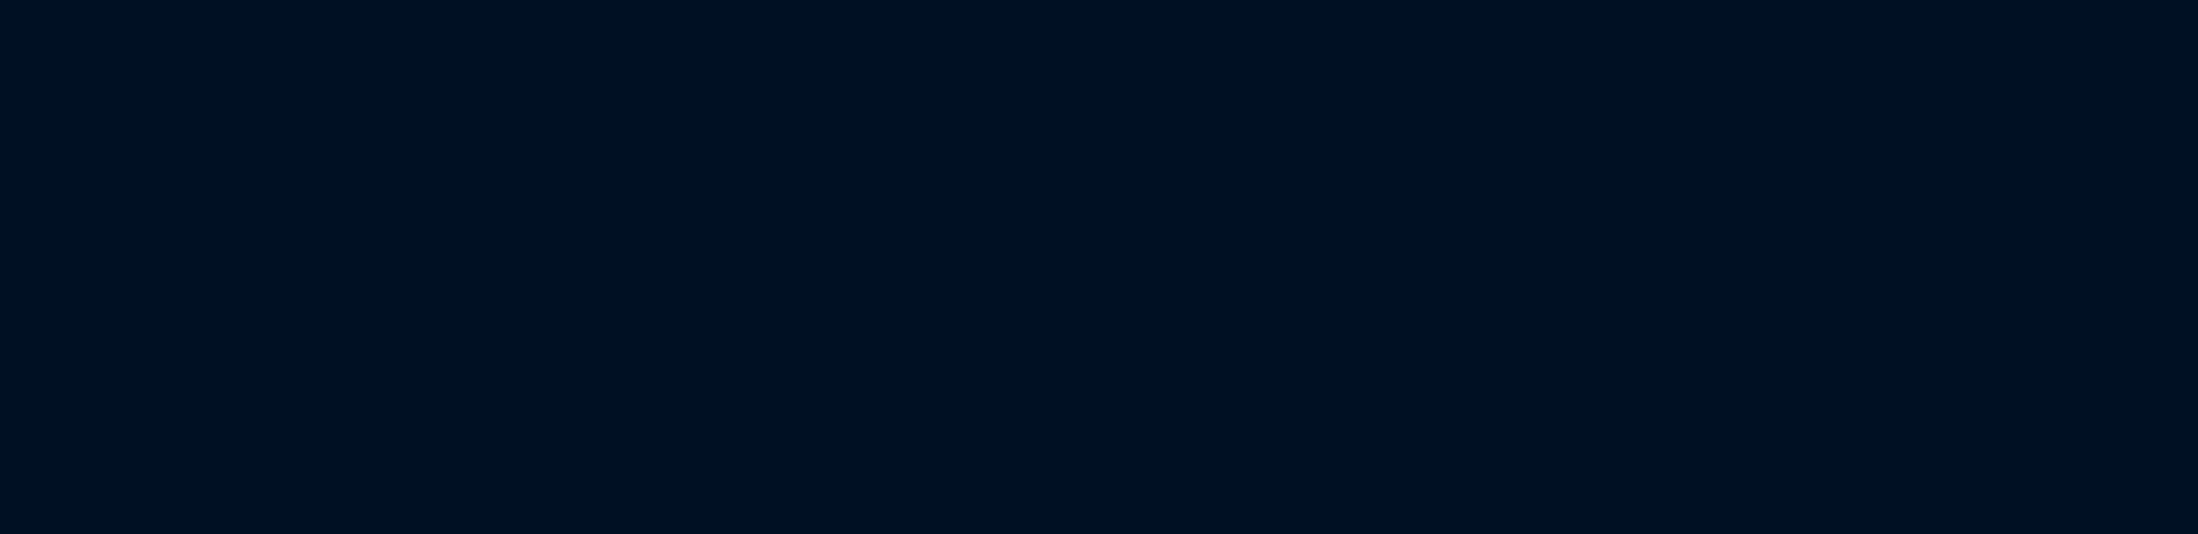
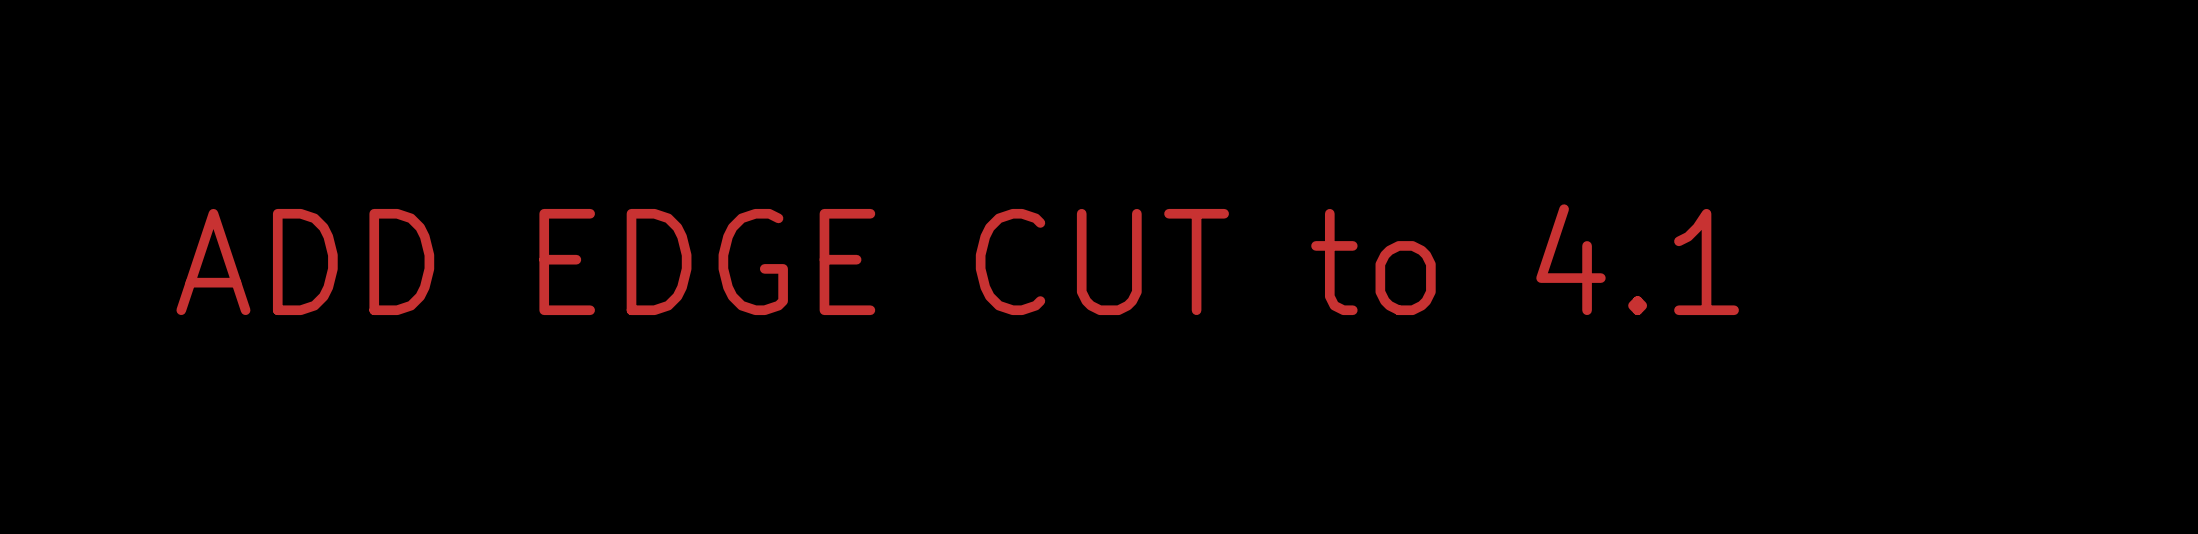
text: none -> ADD EDGE CUT to 4.1 (957, 259)

